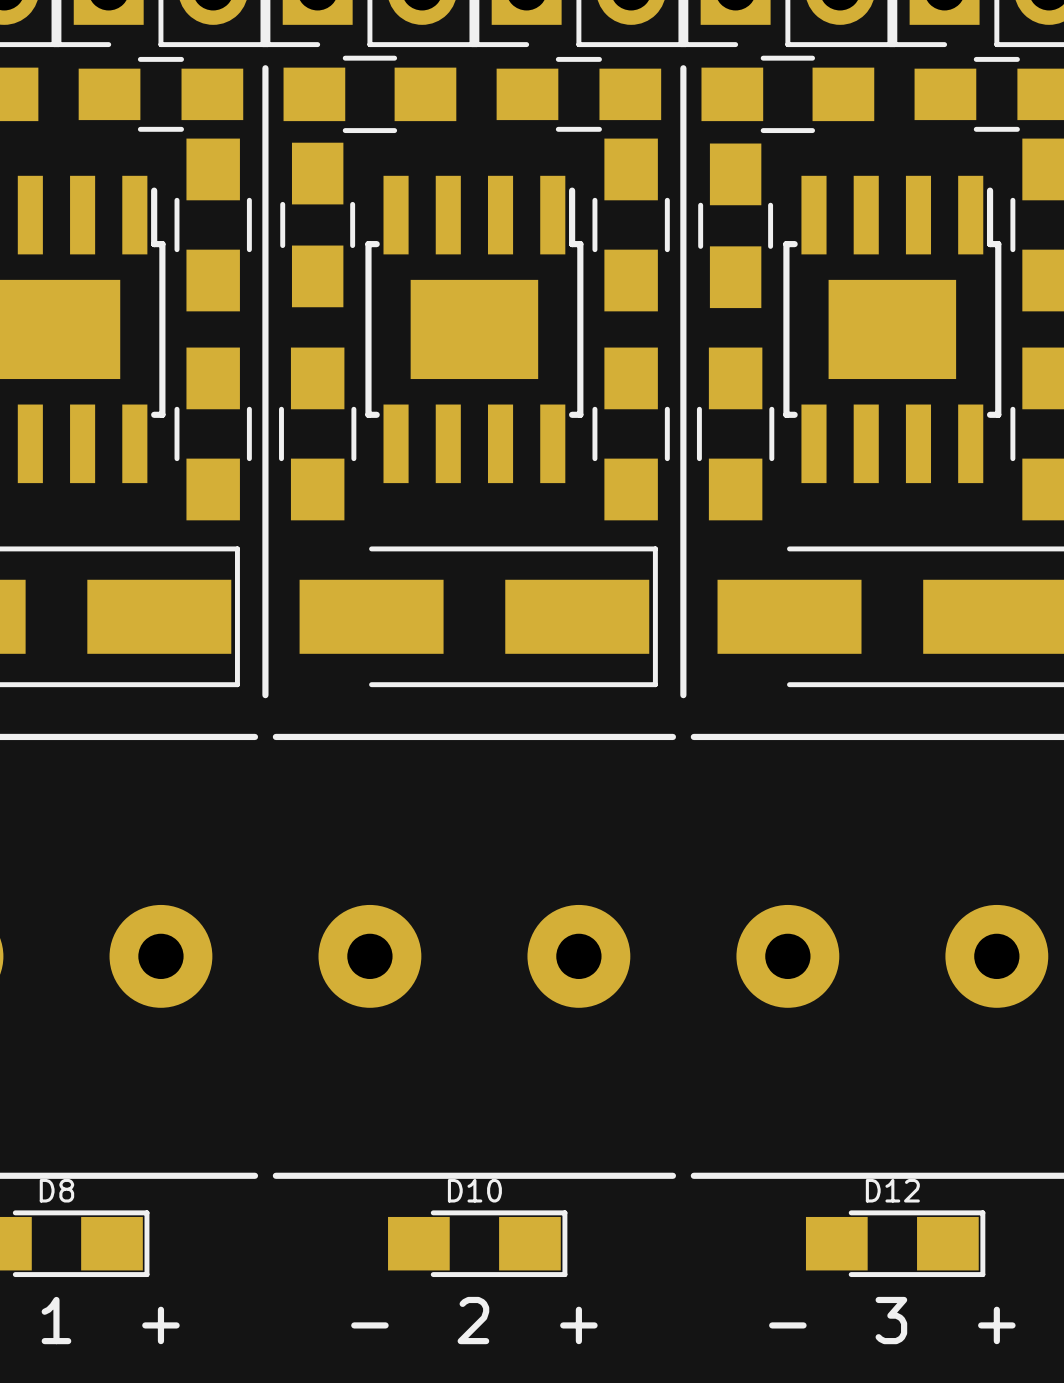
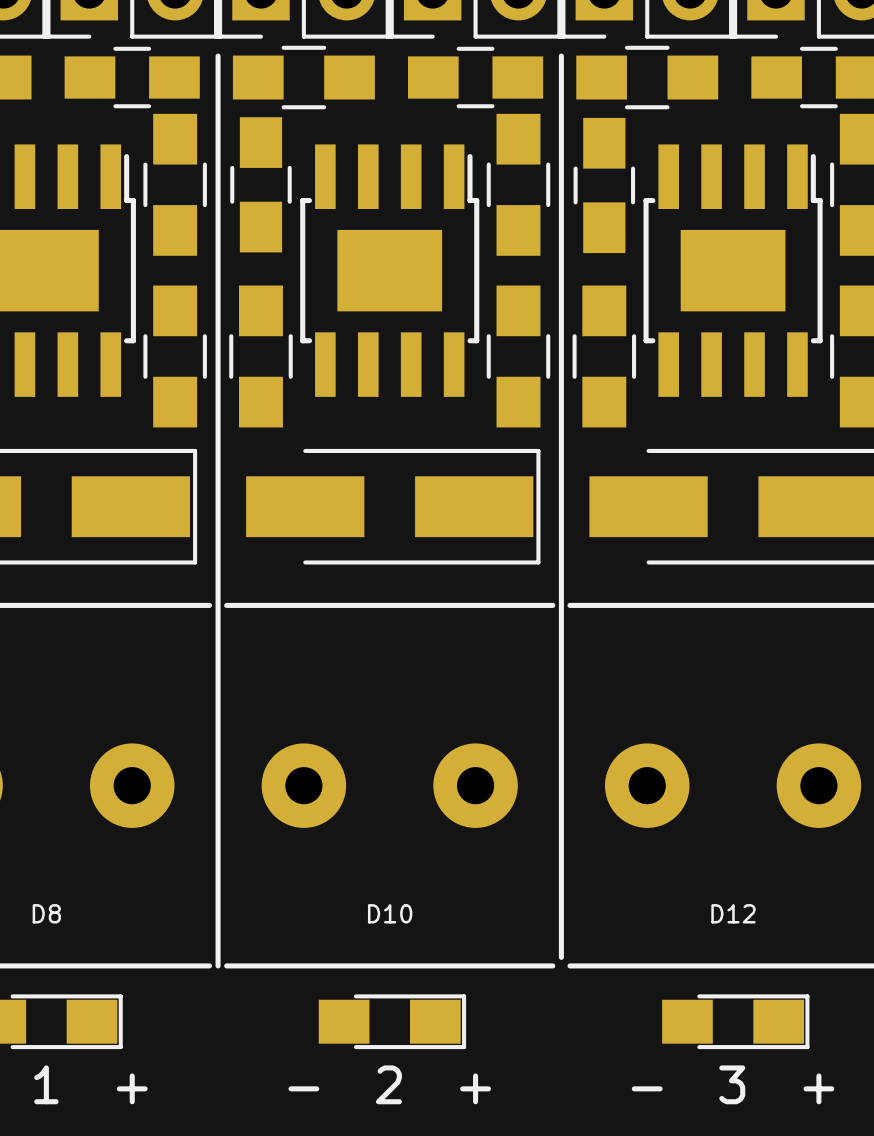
line: none -> (218, 571) (218, 965)
line: none -> (561, 571) (561, 957)
D8 name position: D8 (56, 1190) -> D8 (46, 913)
D10 name position: D10 (474, 1190) -> D10 (390, 913)
D12 name position: D12 (892, 1190) -> D12 (733, 913)

